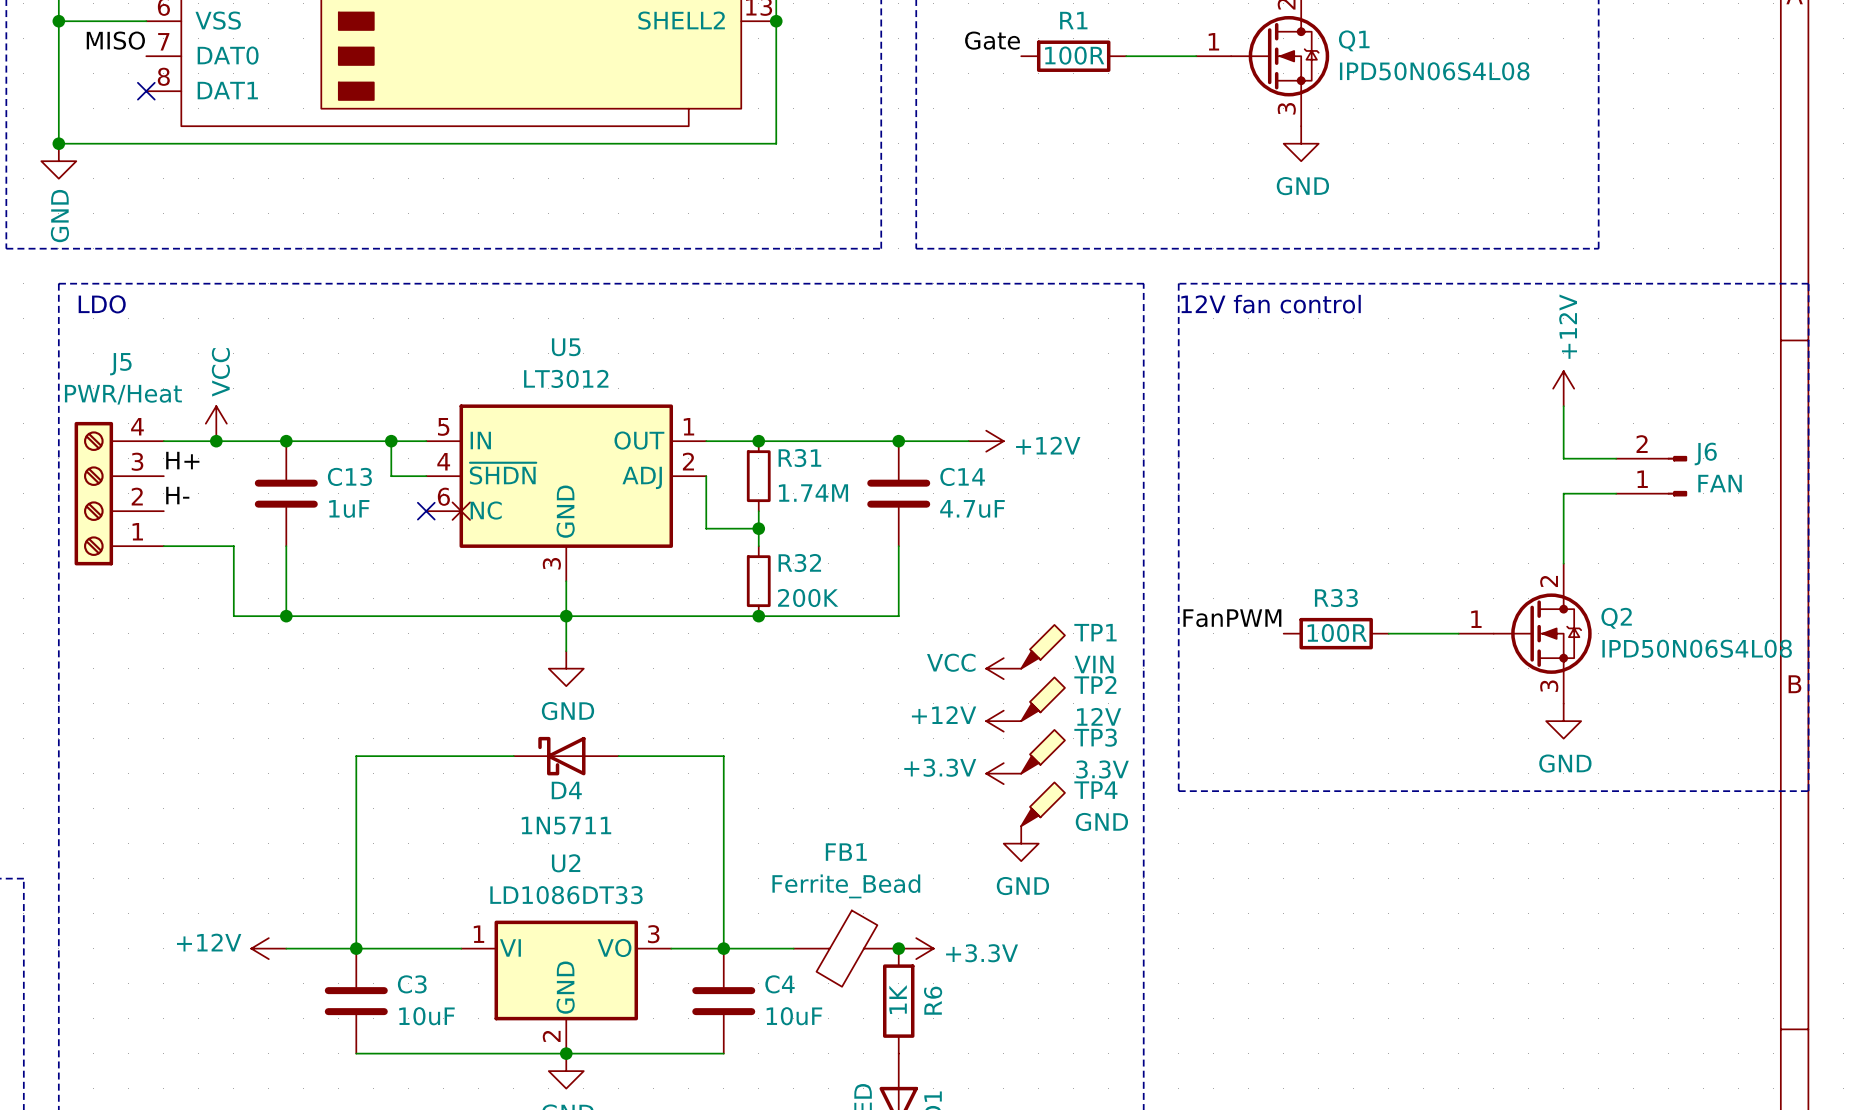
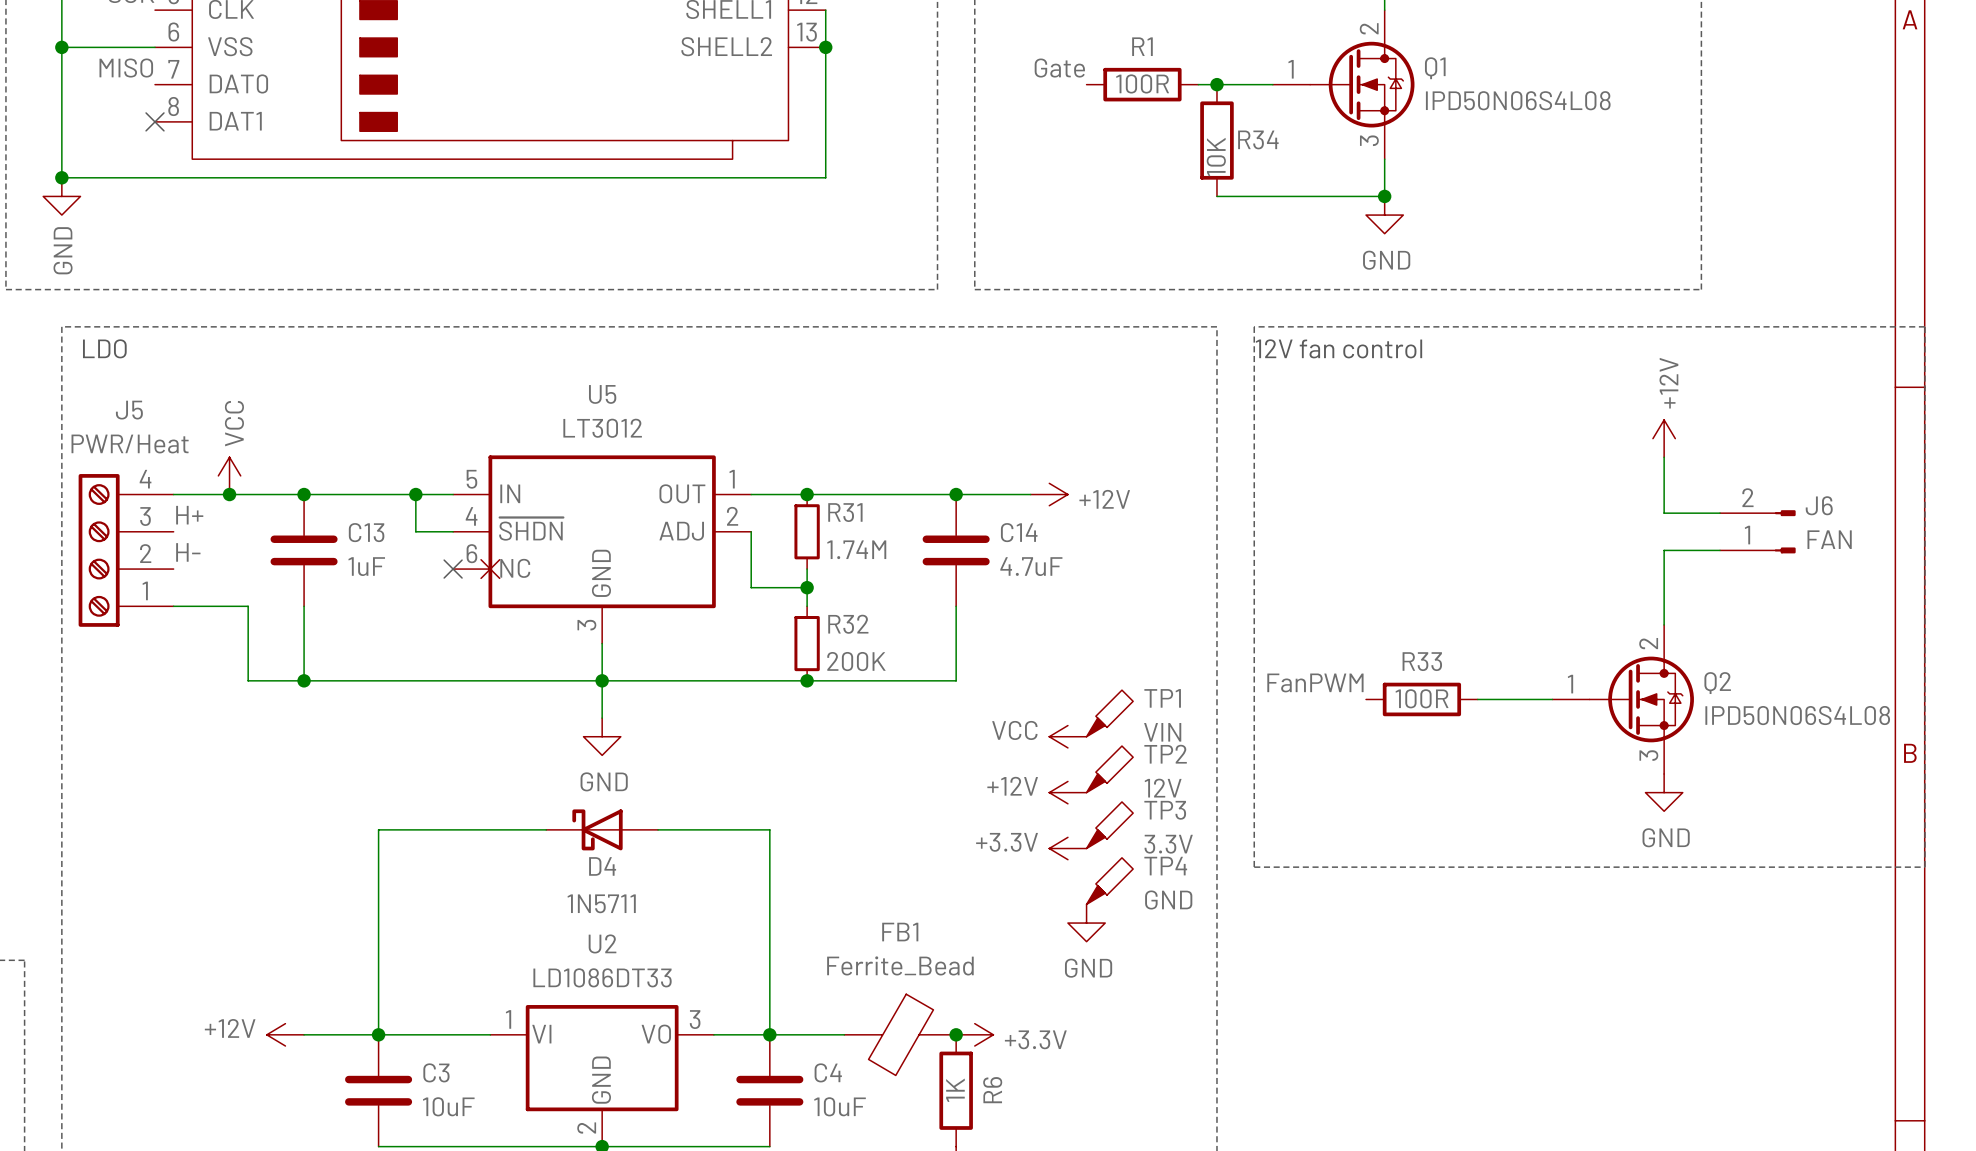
junction: none -> (1216, 84)
R34: none -> 10K (1216, 140)
wire: none -> (1384, 159) (1384, 196) (1216, 196)
power symbol position: GND (1301, 143) -> GND (1384, 215)
junction: none -> (1384, 196)

